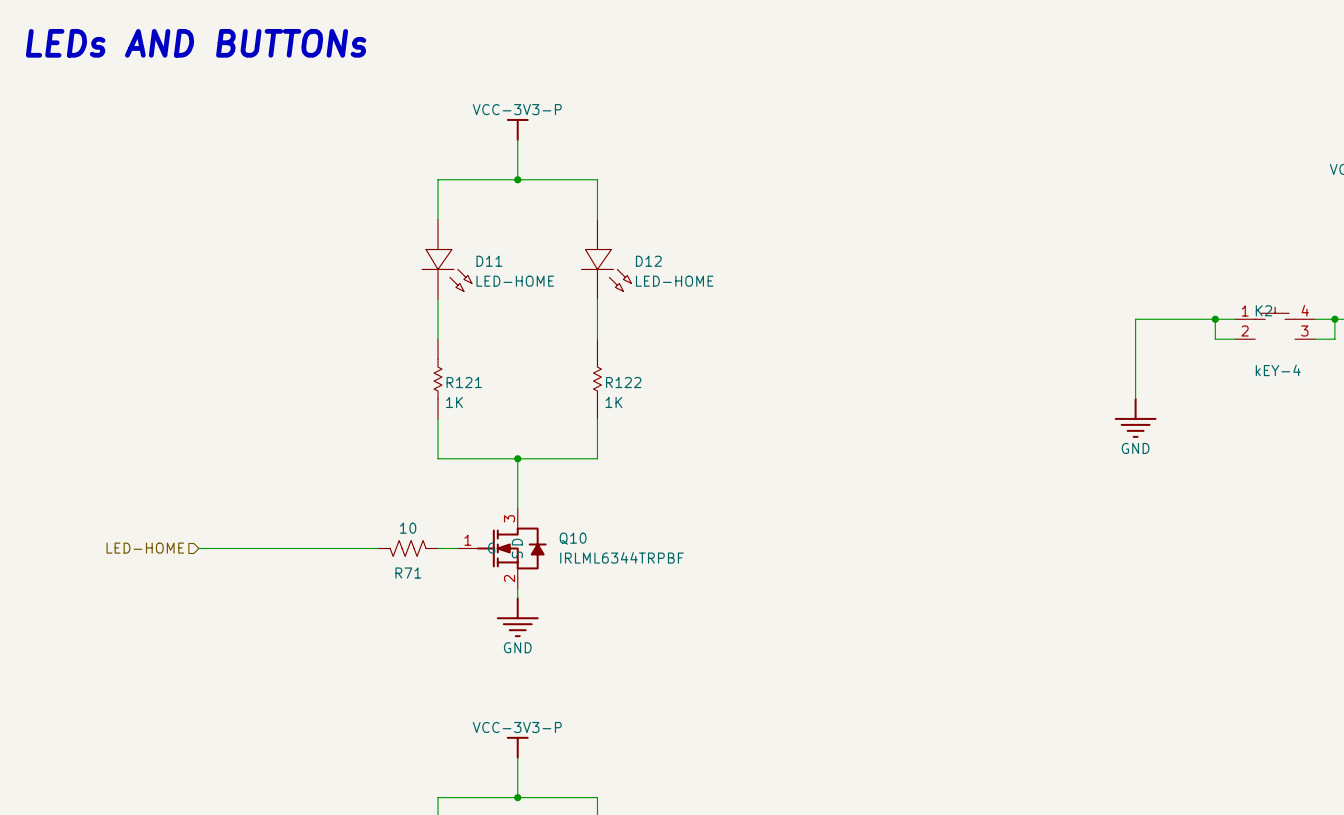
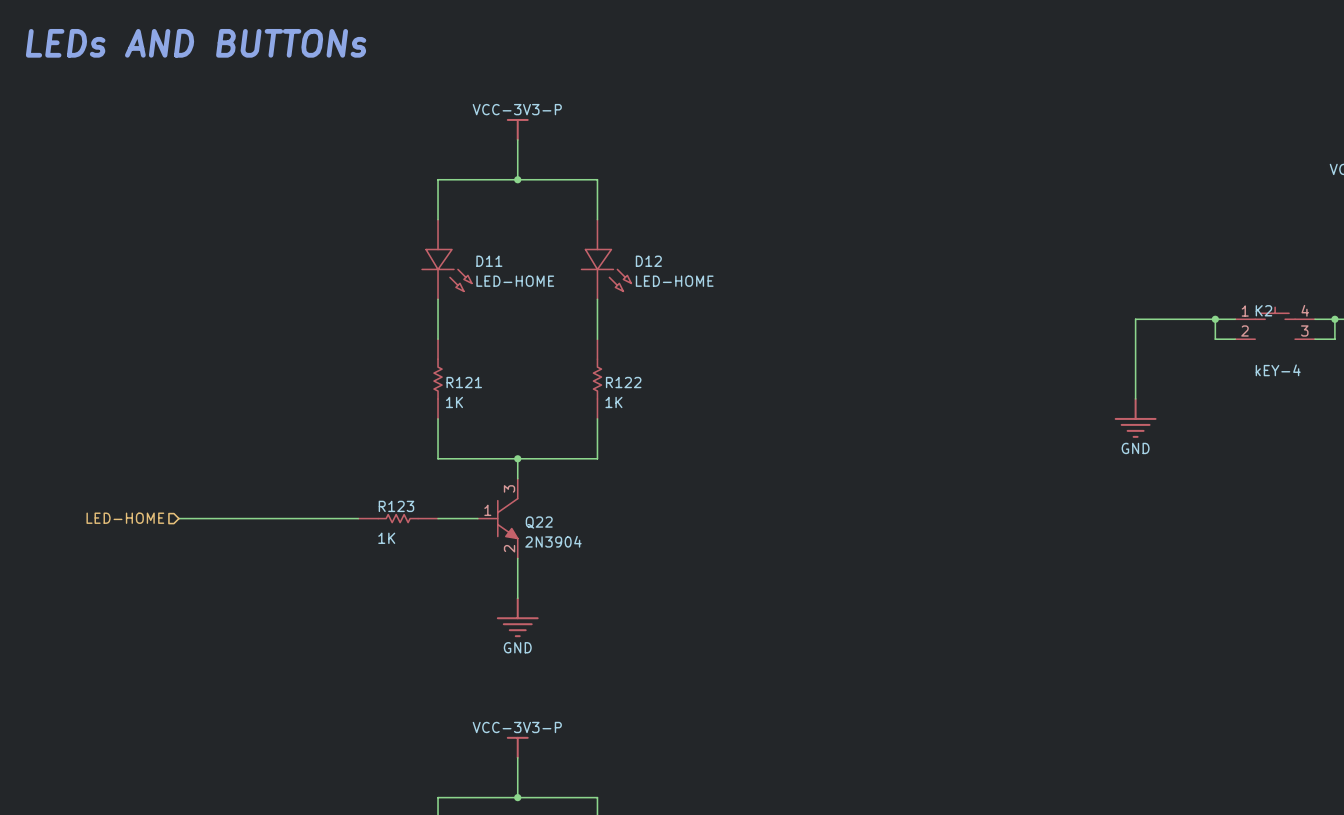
R123: none -> 1K (398, 518)
wire: none -> (438, 518) (477, 518)
Q22: none -> 2N3904 (497, 518)
hierarchical label position: LED-HOME (145, 548) -> LED-HOME (125, 518)
wire: (198, 548) (378, 548) -> (178, 518) (358, 518)
R71: 10 (408, 548) -> none
wire: (438, 548) (457, 548) -> none
Q10: IRLML6344TRPBF (502, 548) -> none

